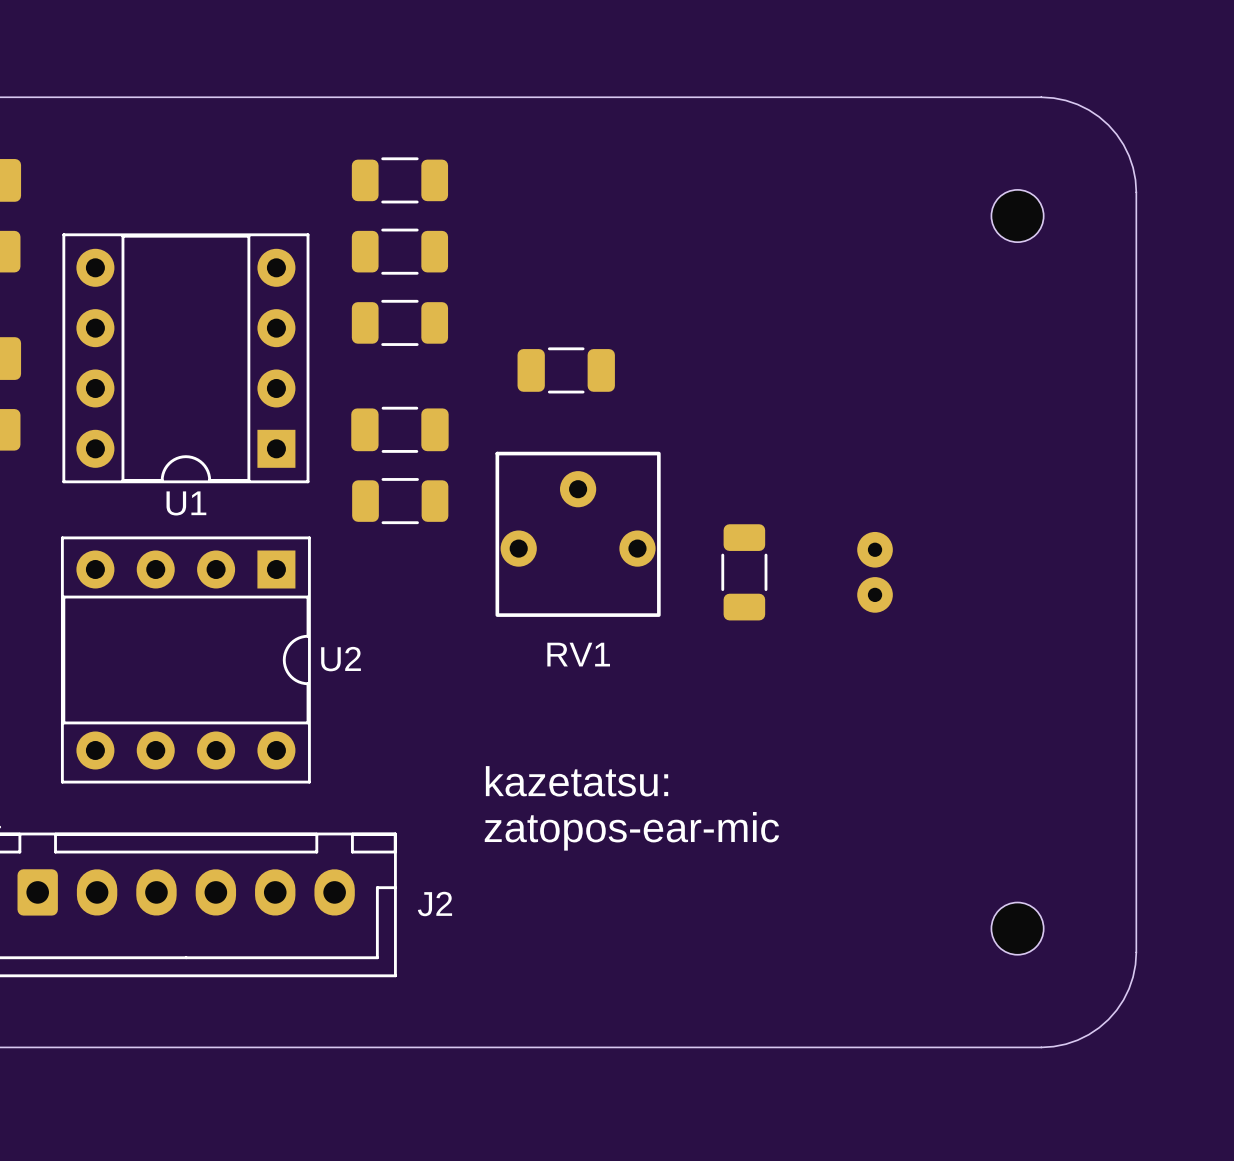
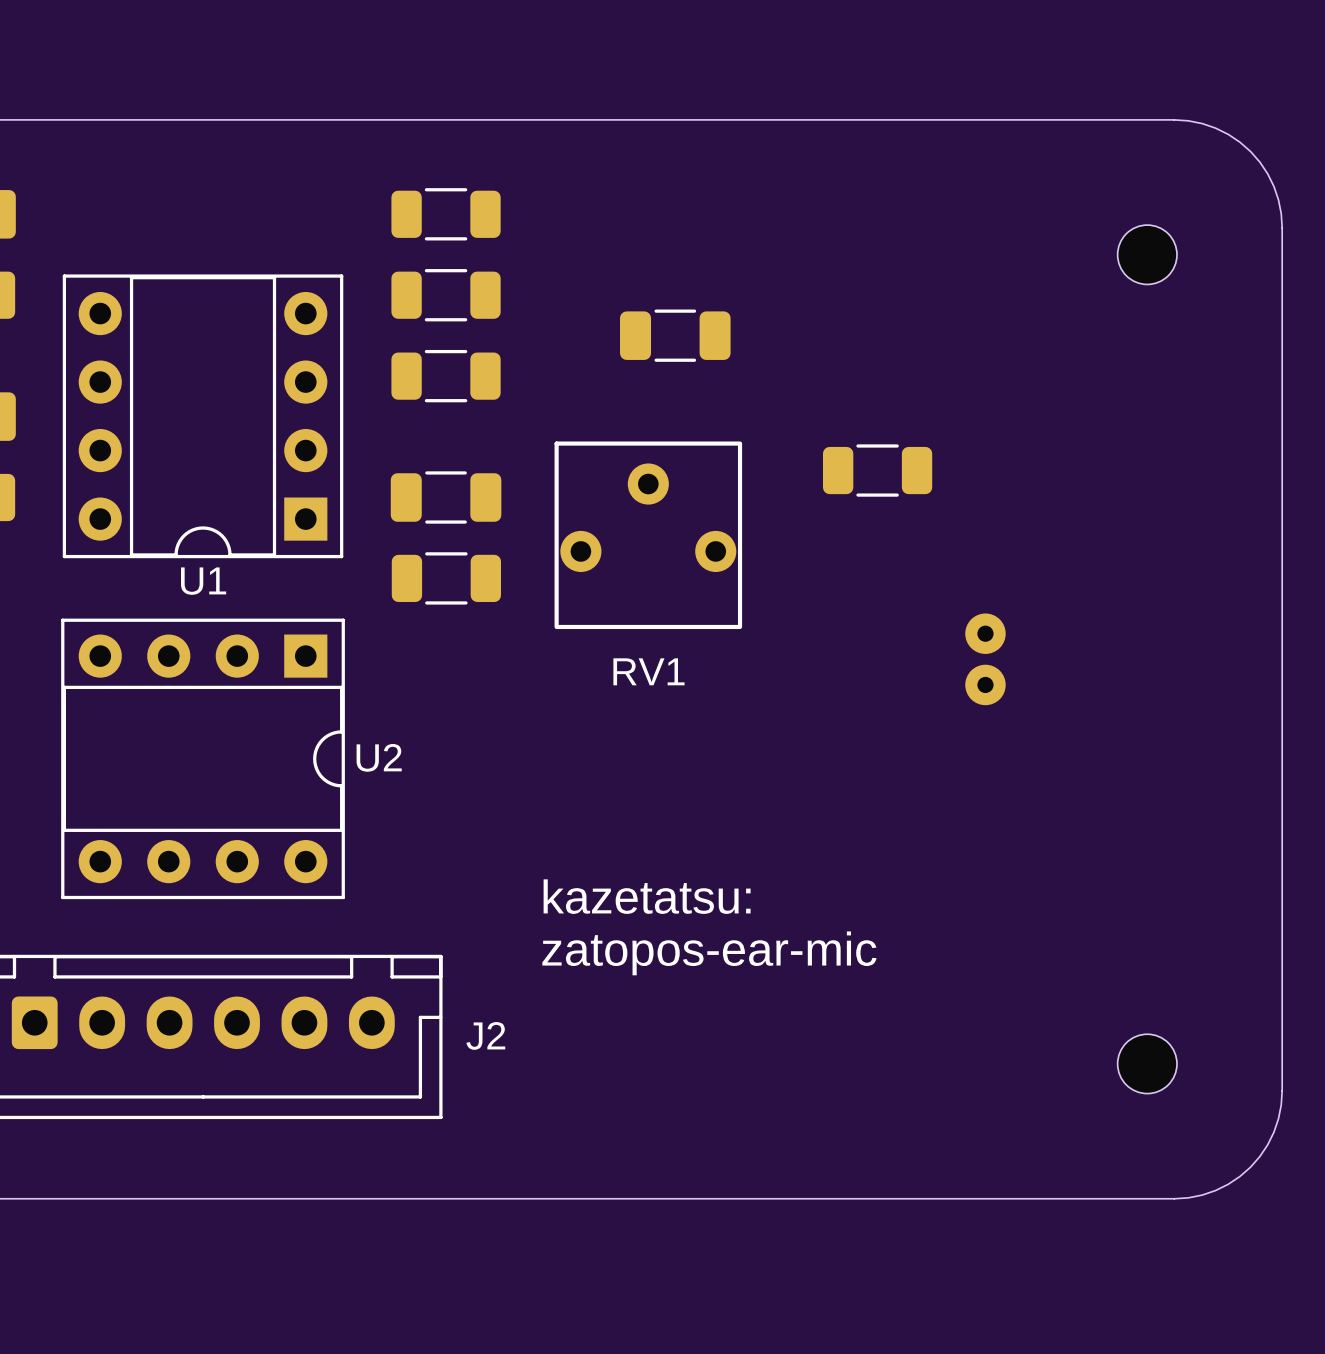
part position: (566, 370) -> (675, 335)
RV1 position: (578, 534) -> (648, 535)
part rotation: 0° (744, 572) -> 90° clockwise (877, 470)
part position: (744, 572) -> (877, 470)

